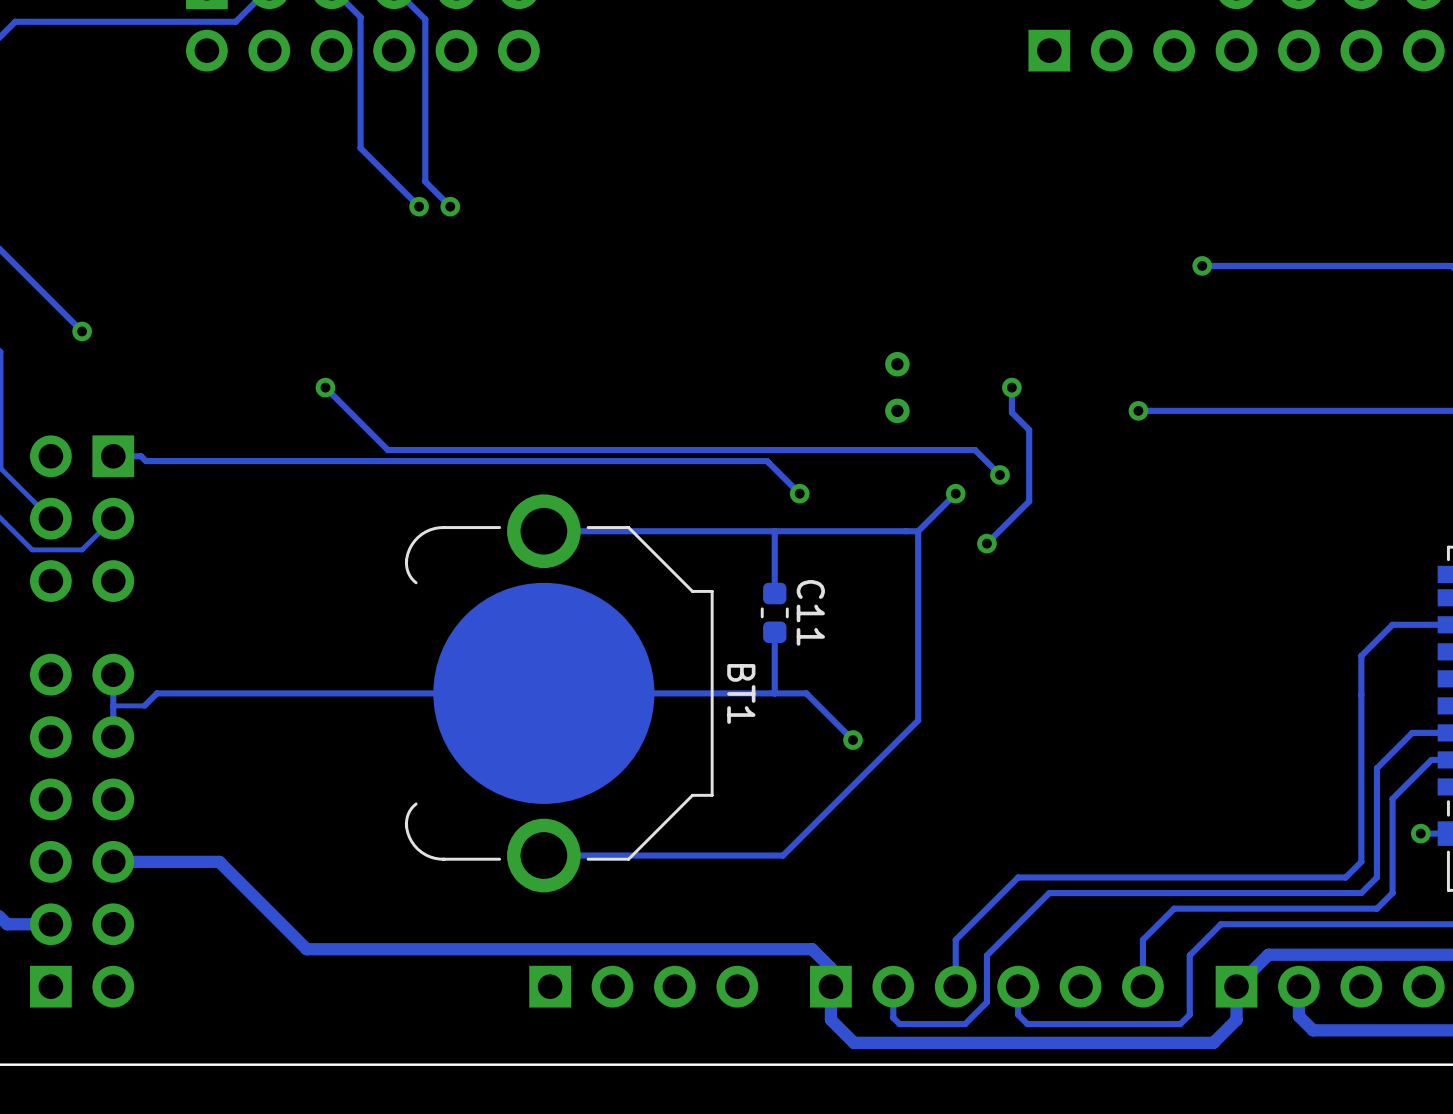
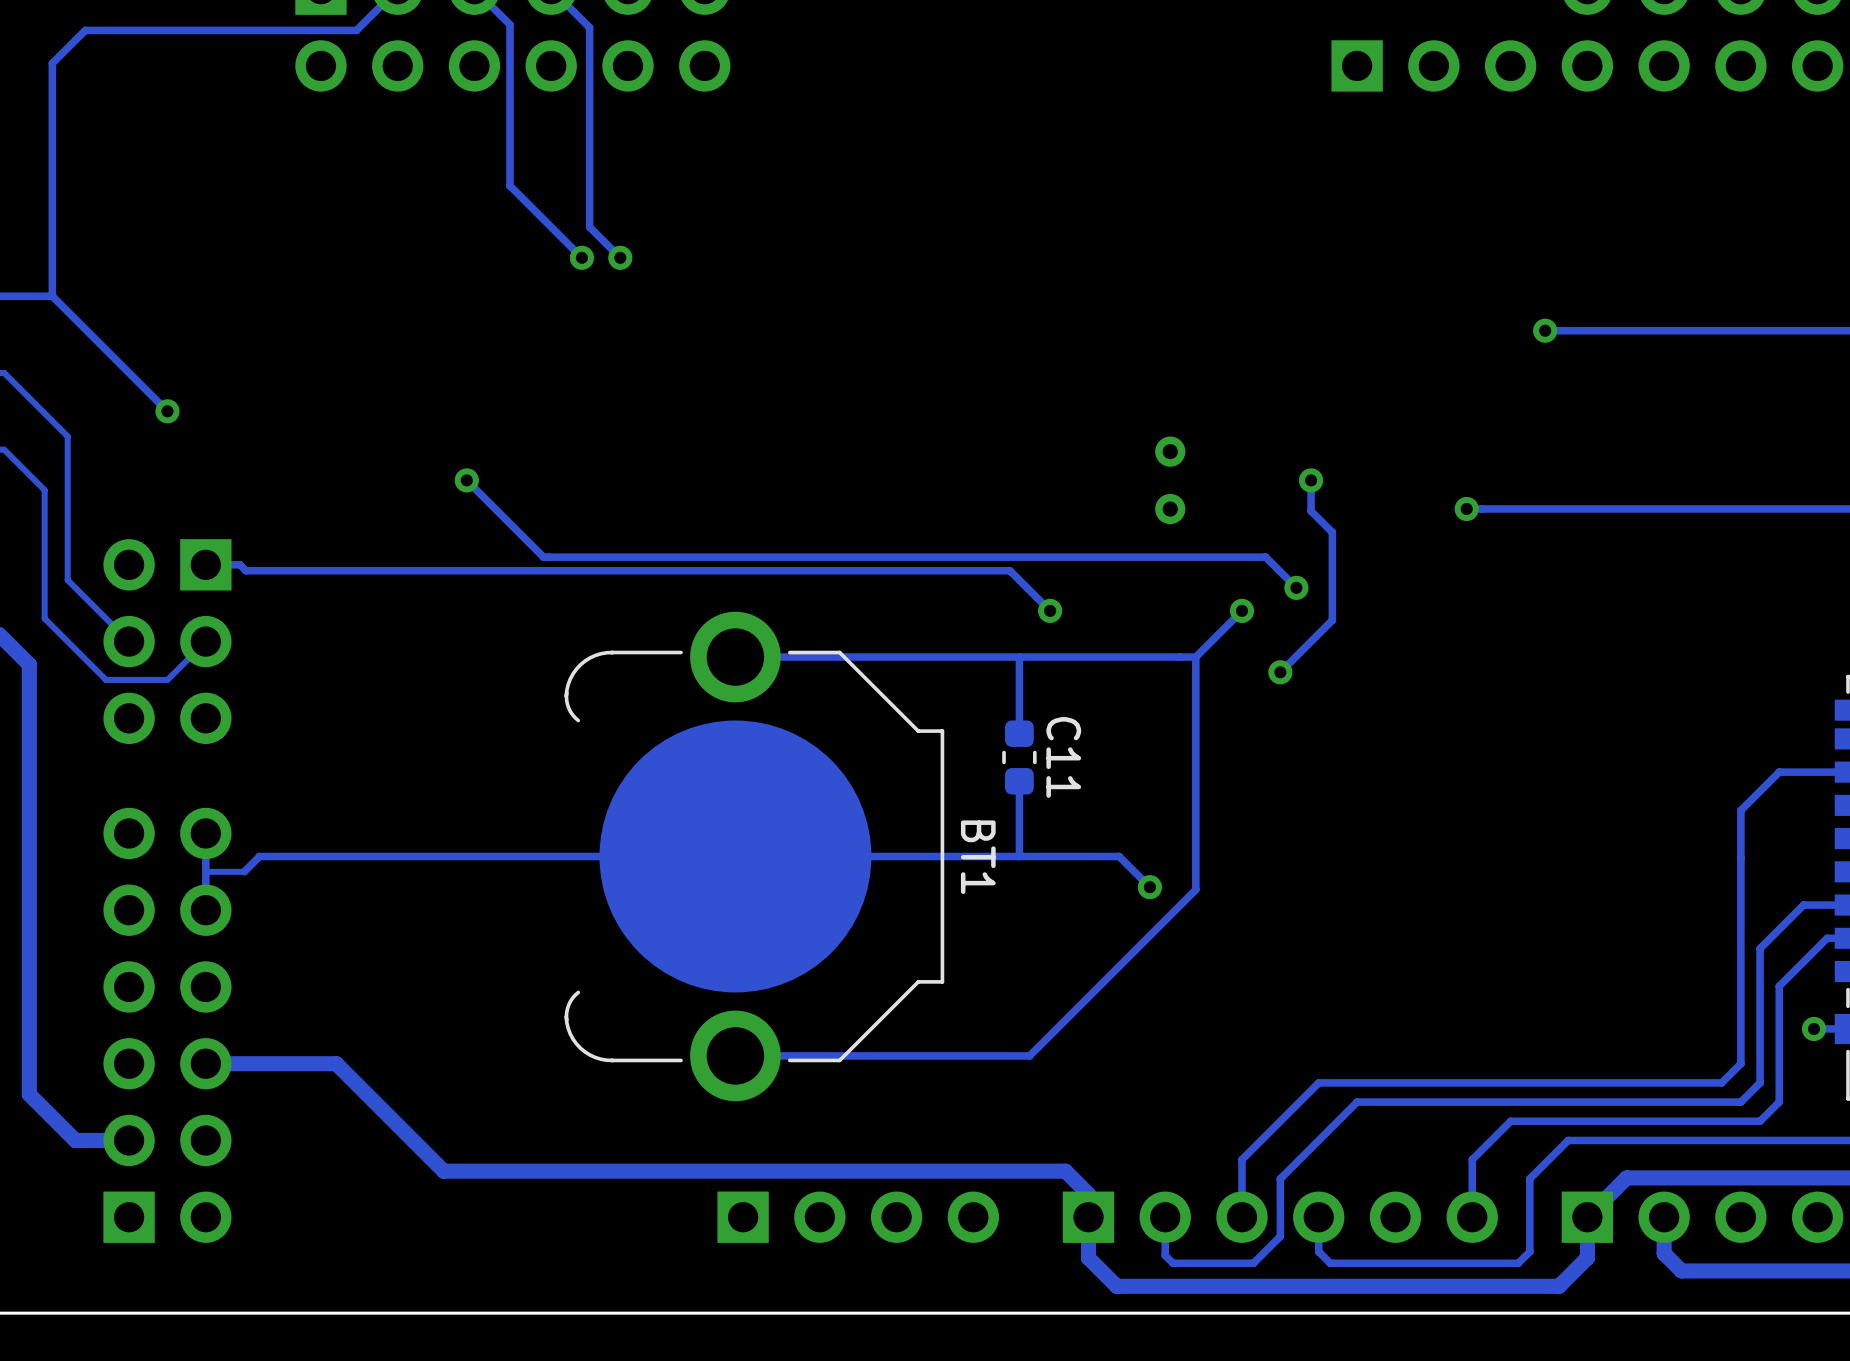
track: (806, 693) (852, 740) -> (1058, 856) (1119, 856) (1149, 887)
via position: (852, 740) -> (1149, 887)

